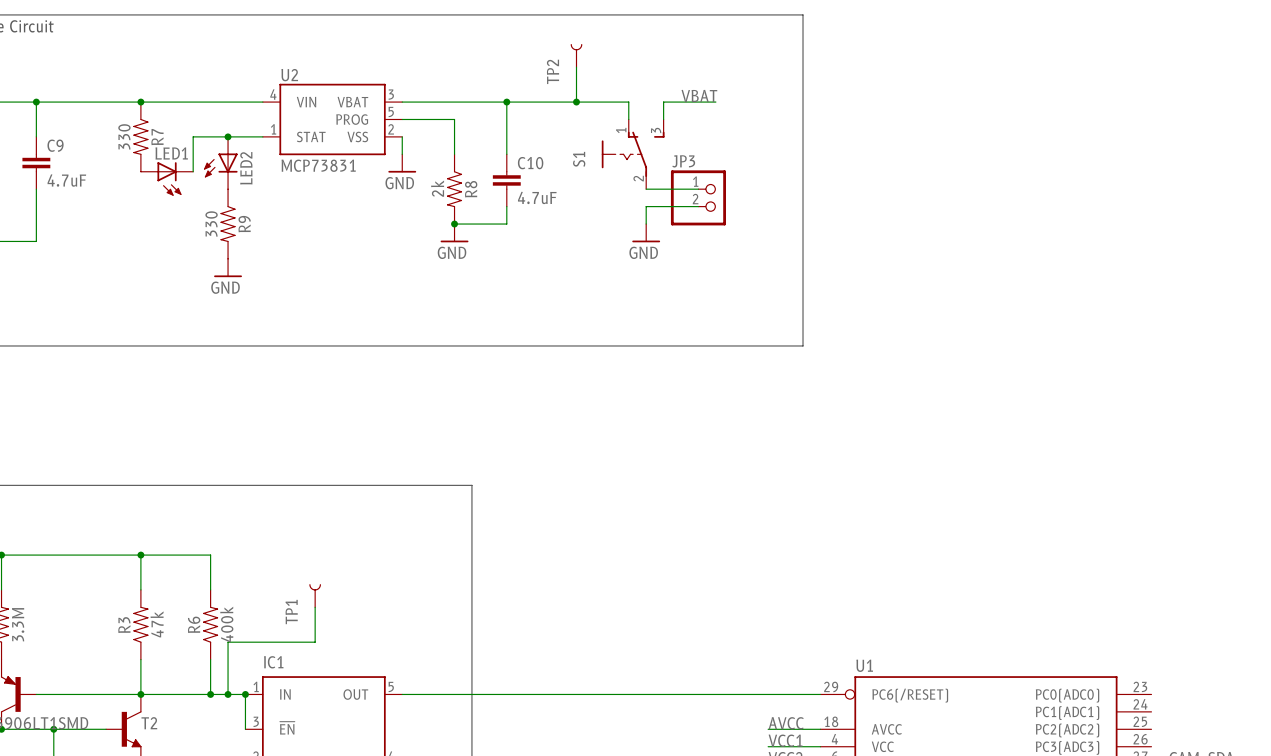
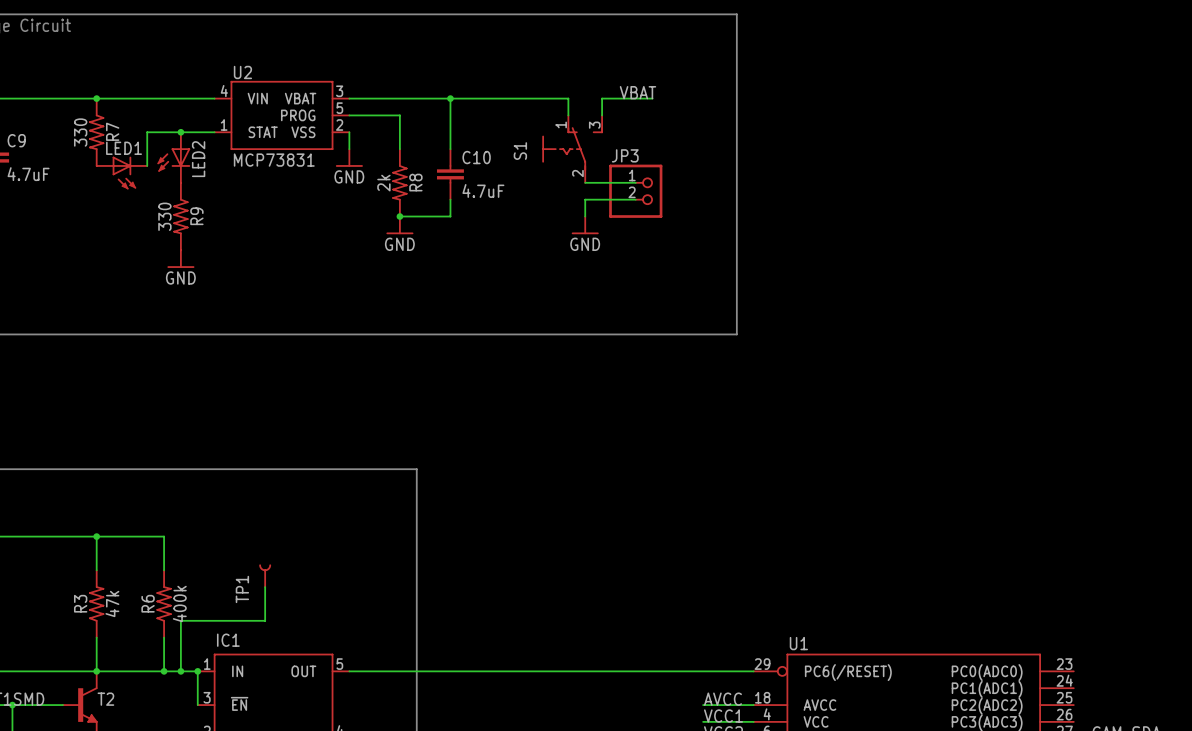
TP2: (576, 55) -> none
wire: (576, 67) (576, 102) -> none
junction: (576, 102) -> none

